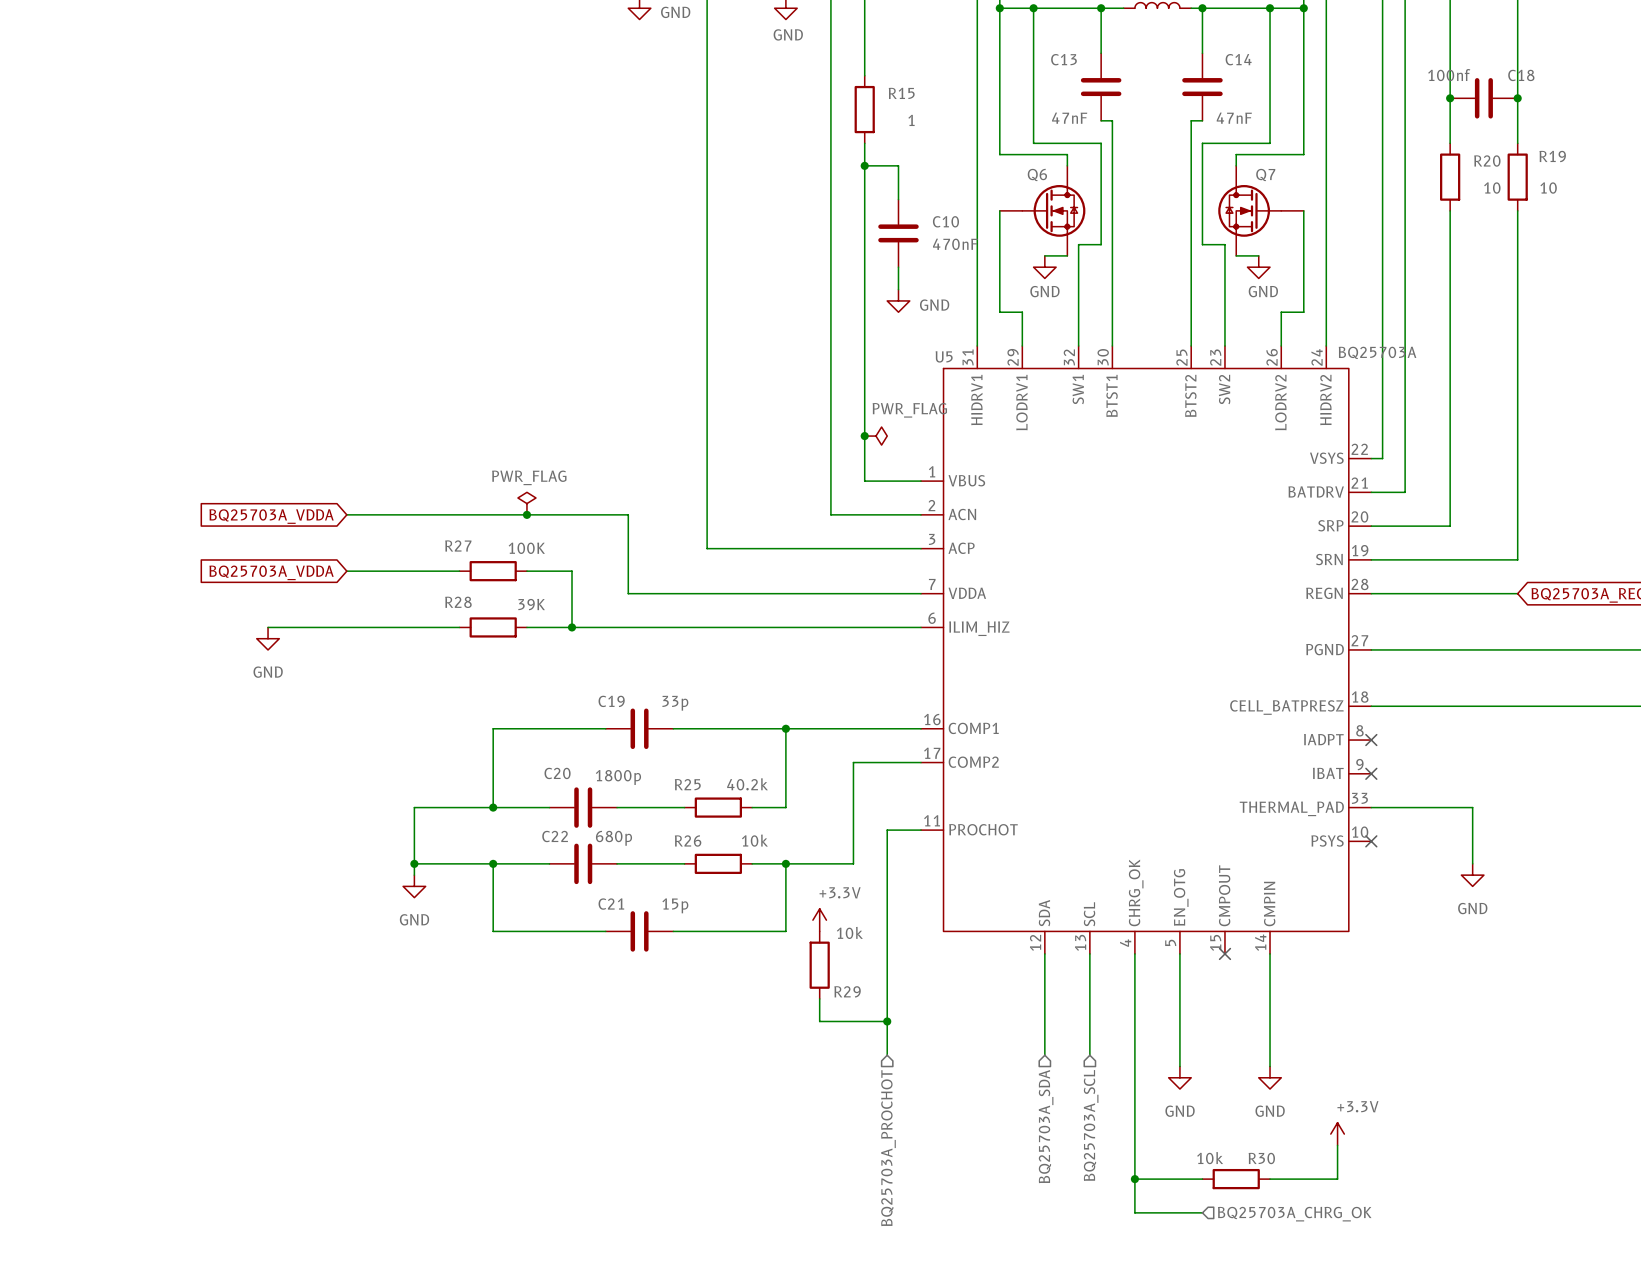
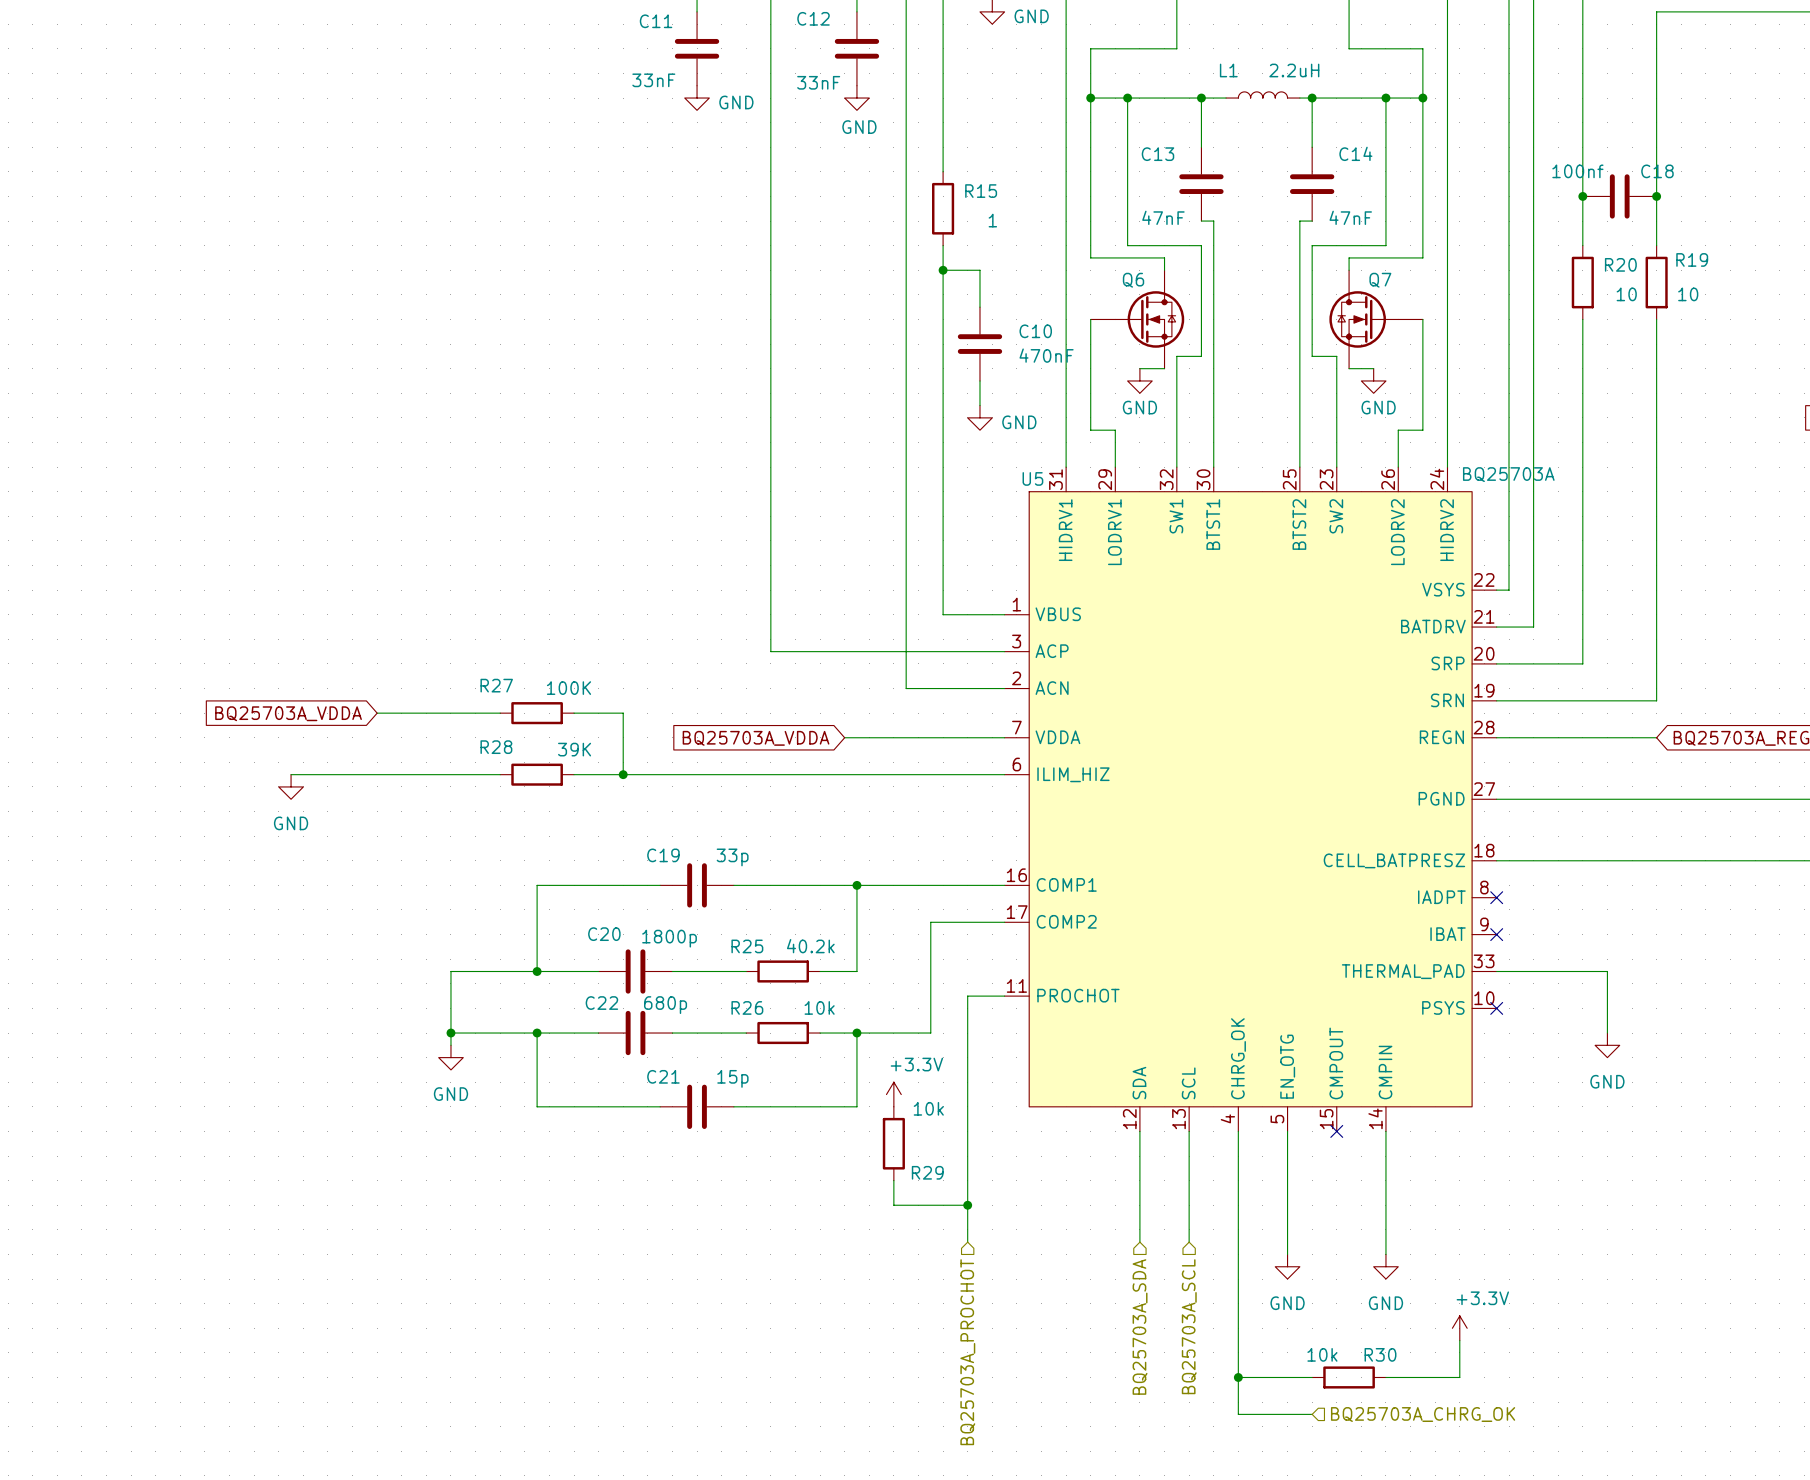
junction: (864, 436) -> none
power symbol: PWR_FLAG (875, 436) -> none
power symbol: PWR_FLAG (526, 503) -> none
U5 pin number: 2 (931, 505) -> 3 (1016, 641)
wire: (346, 514) (628, 514) (628, 593) (774, 593) -> none
junction: (526, 514) -> none
wire: (707, 514) (707, 548) (830, 548) -> (770, 651) (906, 651) (906, 688)
U5 pin name: ACN (962, 514) -> ACP (1052, 651)
global label: BQ25703A_VDDA (271, 516) -> none
U5 pin number: 3 (932, 539) -> 2 (1016, 678)
U5 pin name: ACP (961, 548) -> ACN (1052, 688)
global label: none -> BQ25703A_VDDA (756, 738)

